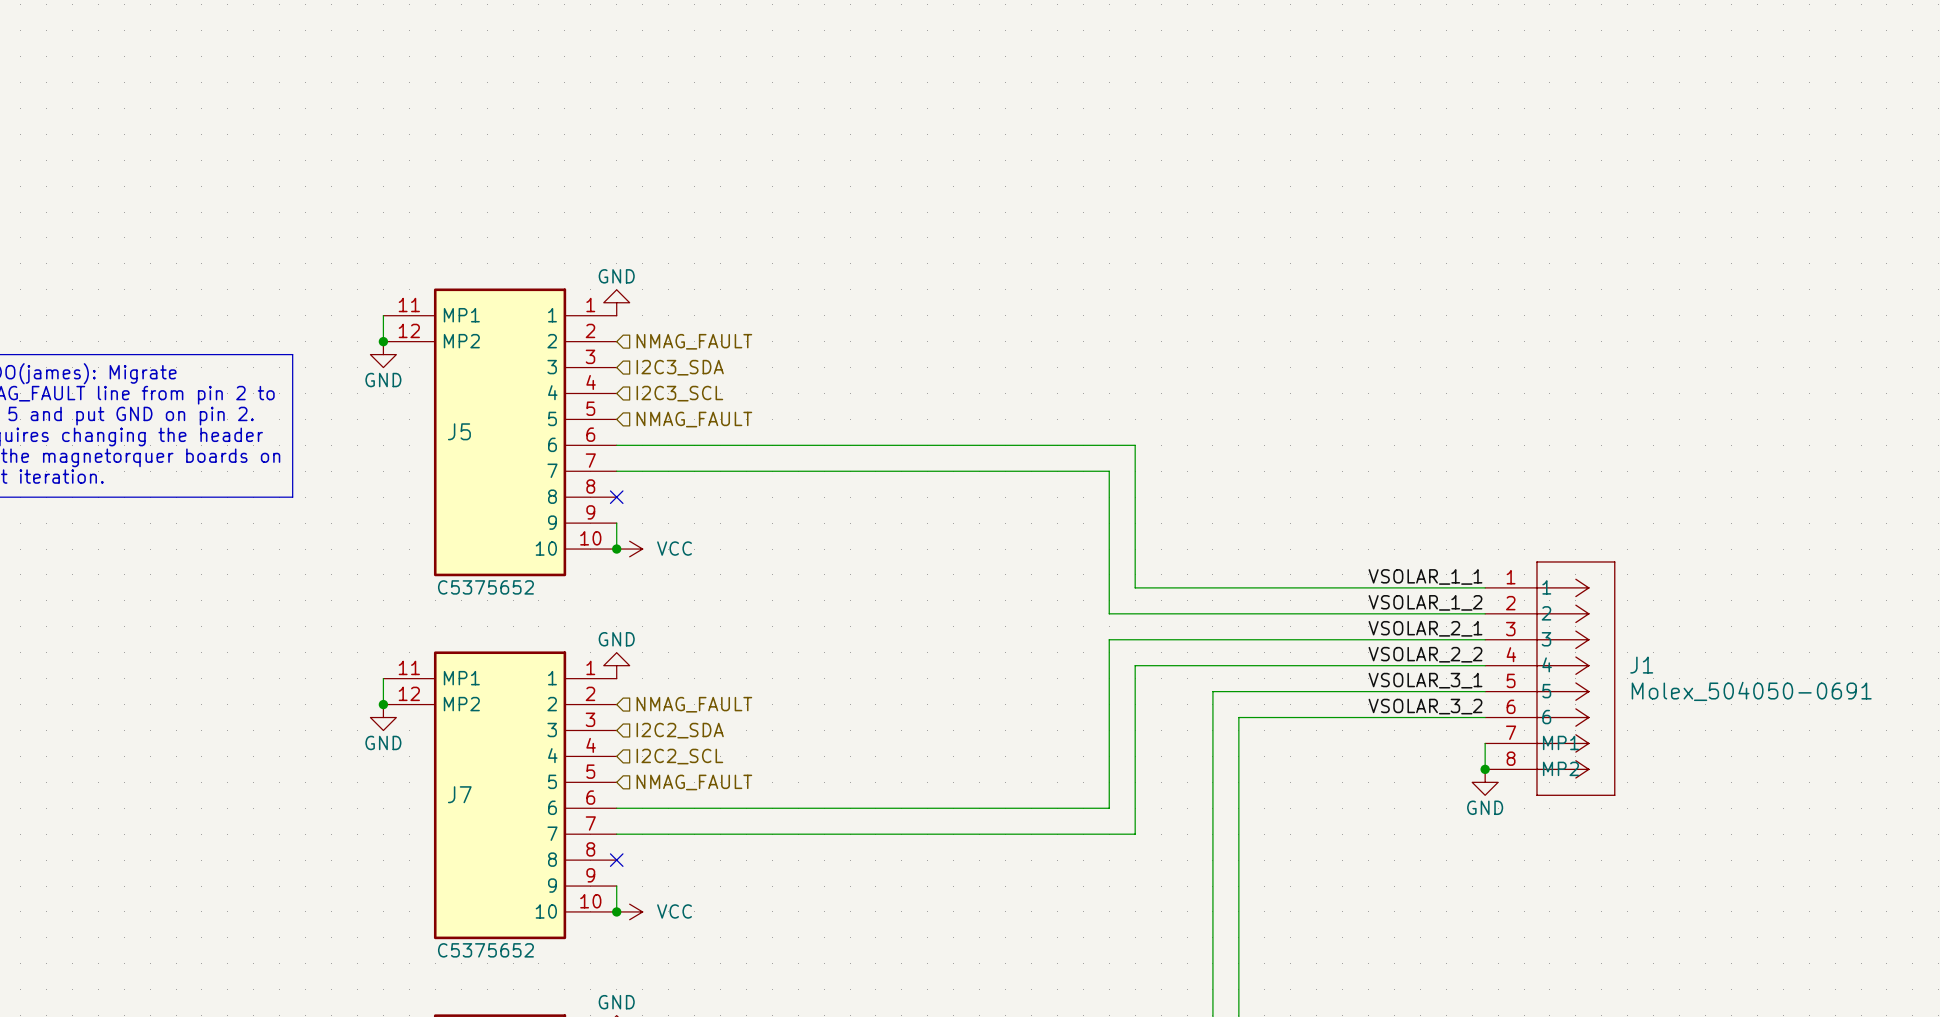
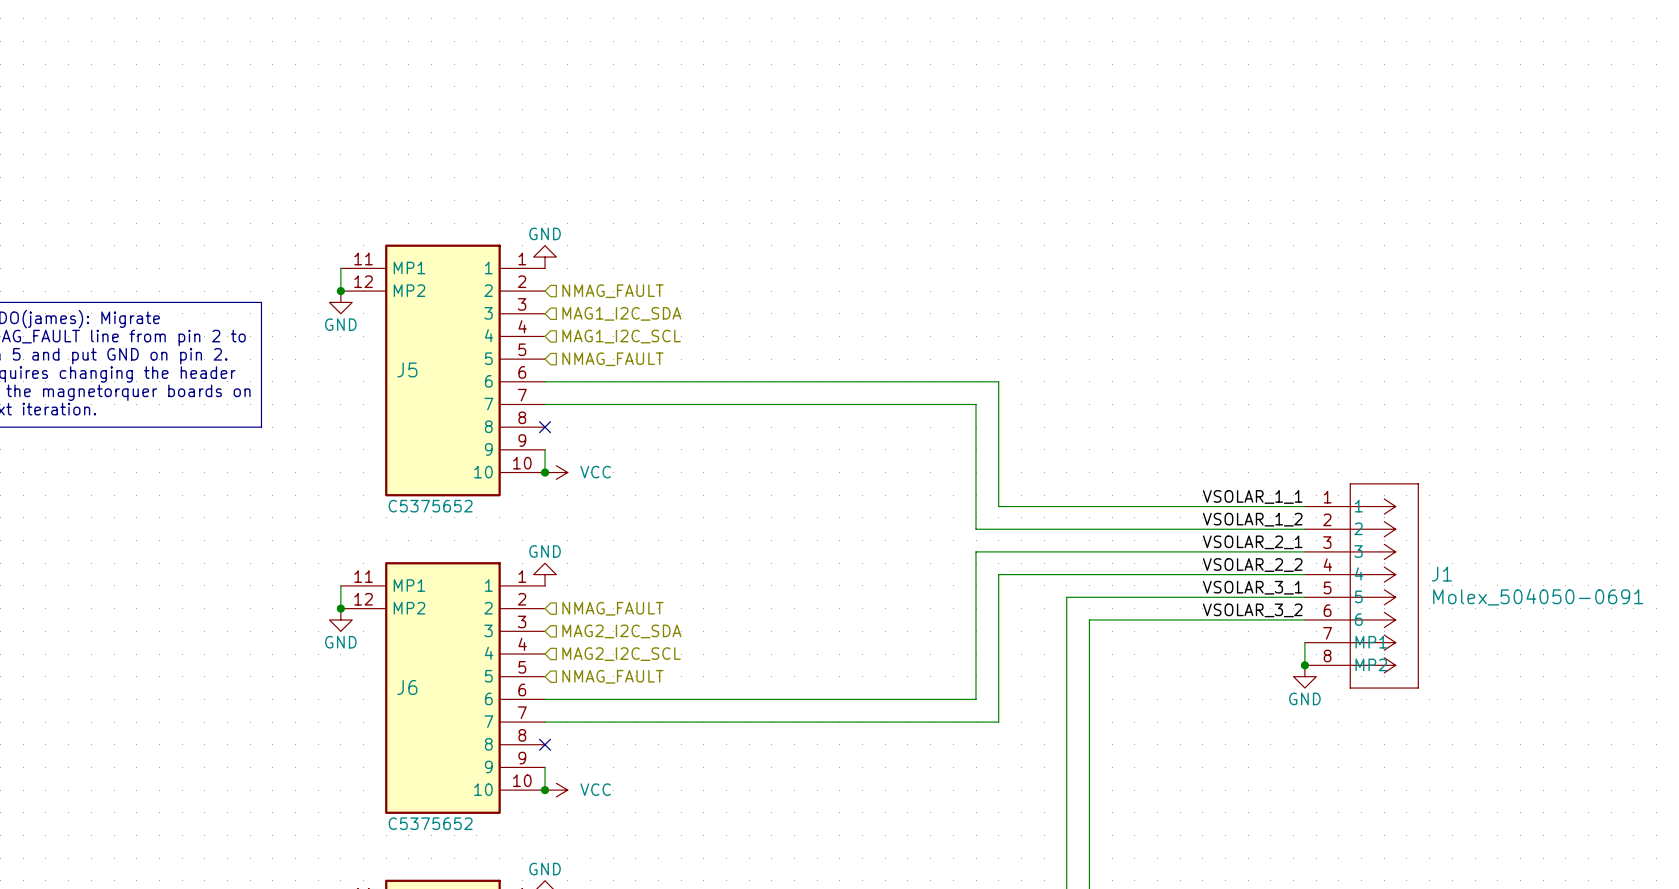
hierarchical label: I2C3_SDA (680, 367) -> MAG1_I2C_SDA (621, 313)
hierarchical label: I2C3_SCL (679, 393) -> MAG1_I2C_SCL (621, 336)
hierarchical label: I2C2_SDA (680, 730) -> MAG2_I2C_SDA (621, 631)
hierarchical label: I2C2_SCL (679, 756) -> MAG2_I2C_SCL (621, 654)
J7 name: J7 (459, 794) -> J6 (407, 687)

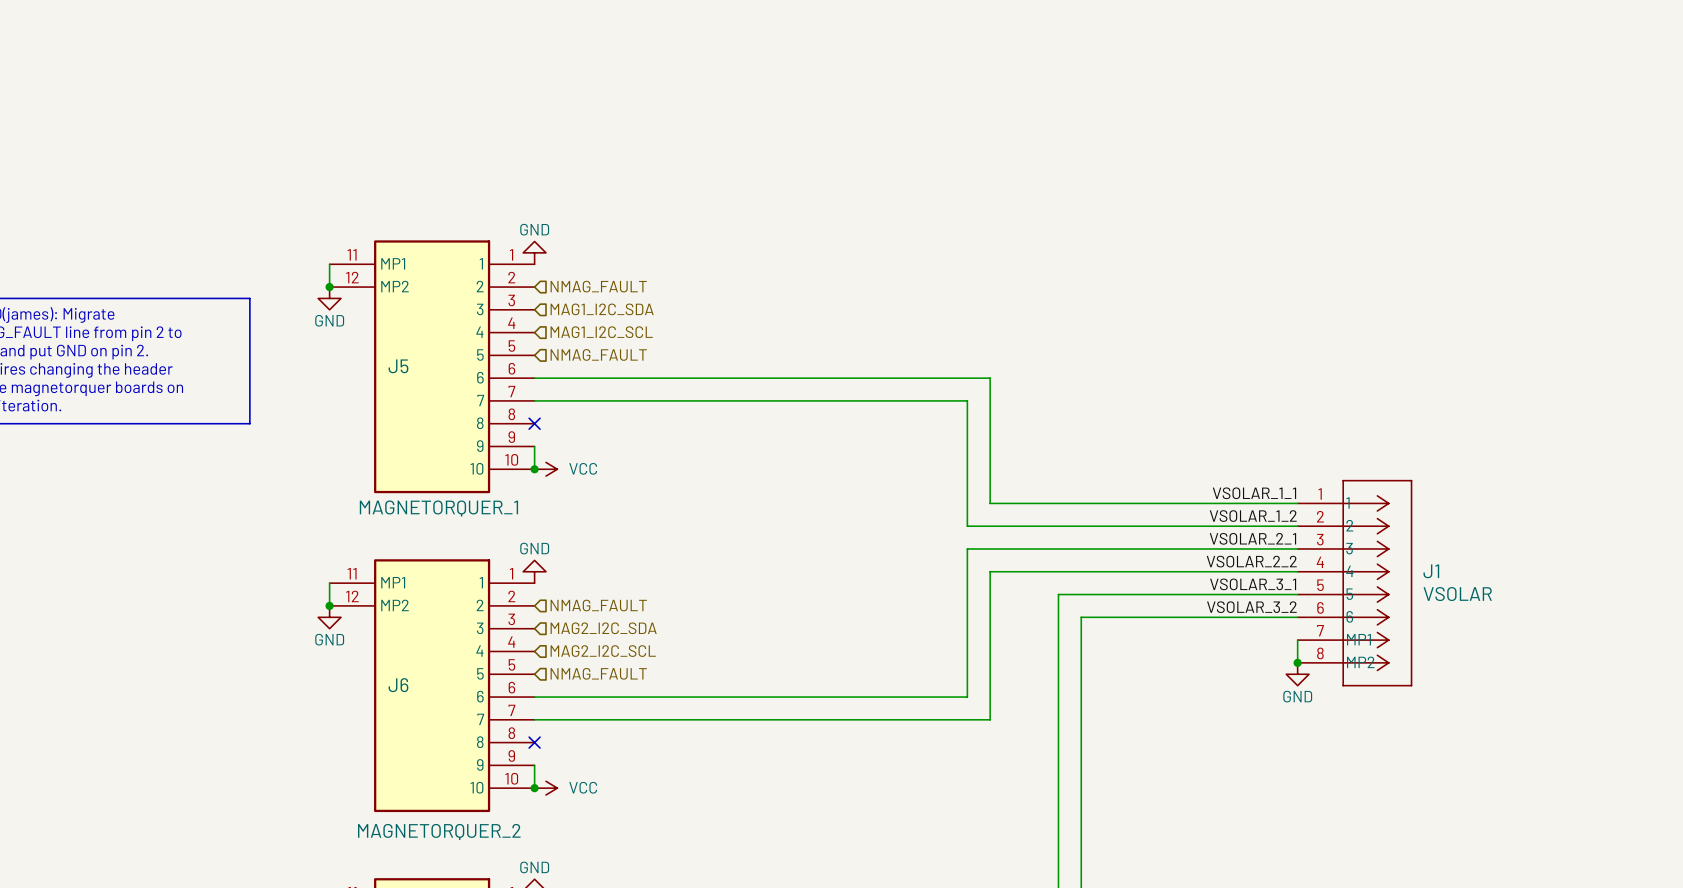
J5 text: C5375652 (430, 506) -> none
J5 value: none -> MAGNETORQUER_1 (438, 508)
J1 value: Molex_504050-0691 (1538, 597) -> VSOLAR (1457, 594)
J6 text: C5375652 (430, 823) -> none
J6 value: none -> MAGNETORQUER_2 (439, 831)

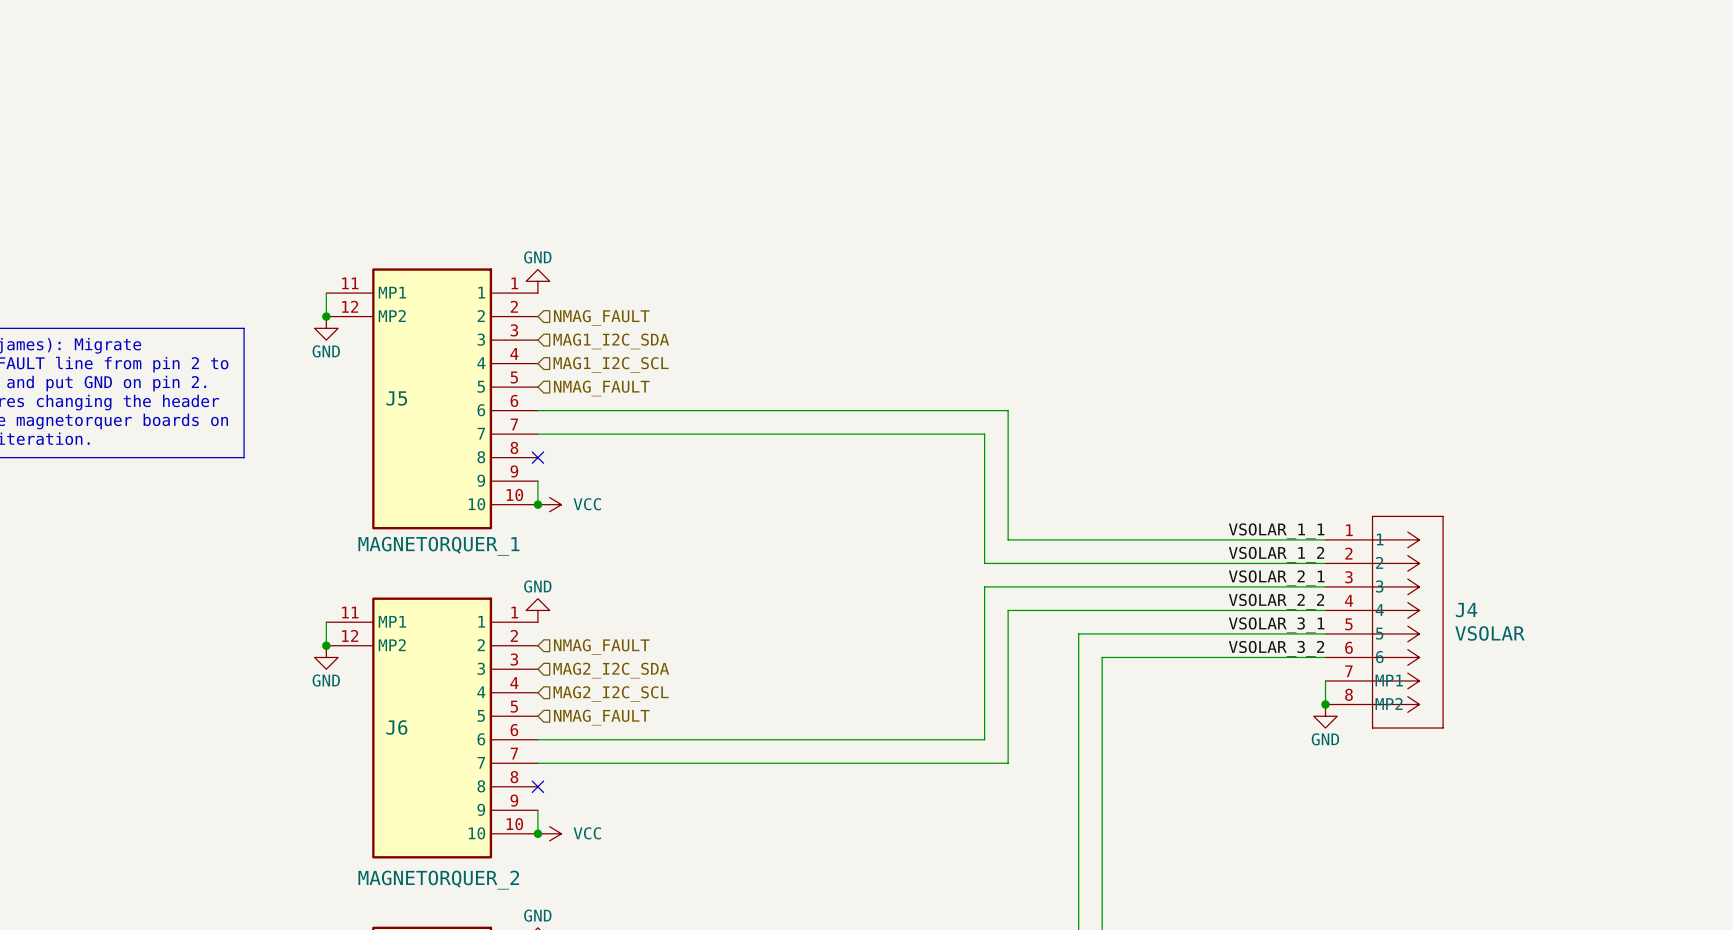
J1 name: J1 (1431, 571) -> J4 (1466, 610)

